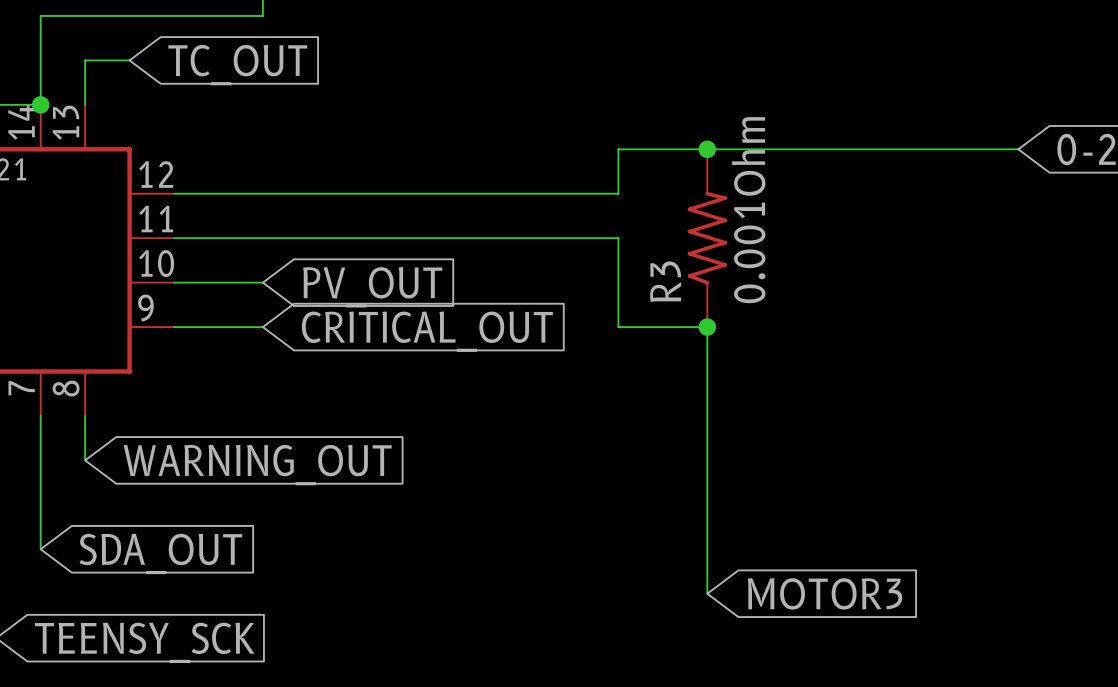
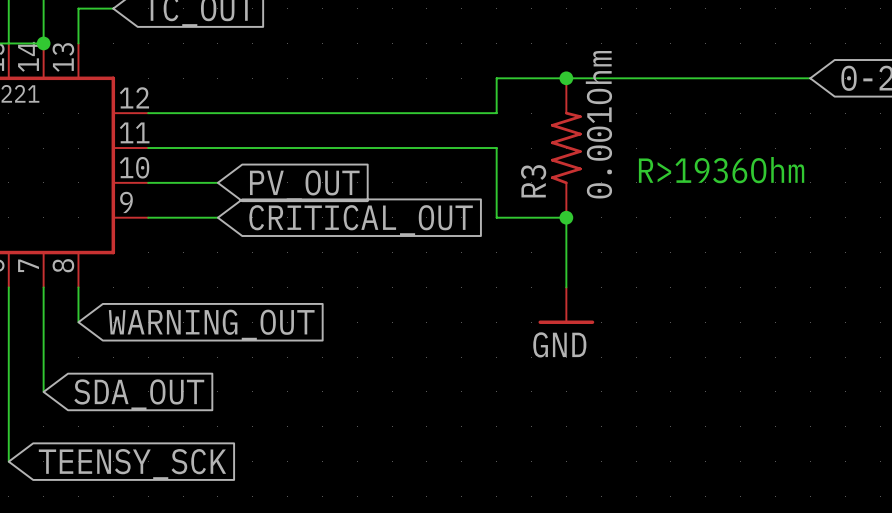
text: none -> R>1936Ohm (721, 170)
wire: (707, 415) (707, 593) -> none
power symbol: none -> GND (566, 305)
global label: MOTOR3 (825, 593) -> none

